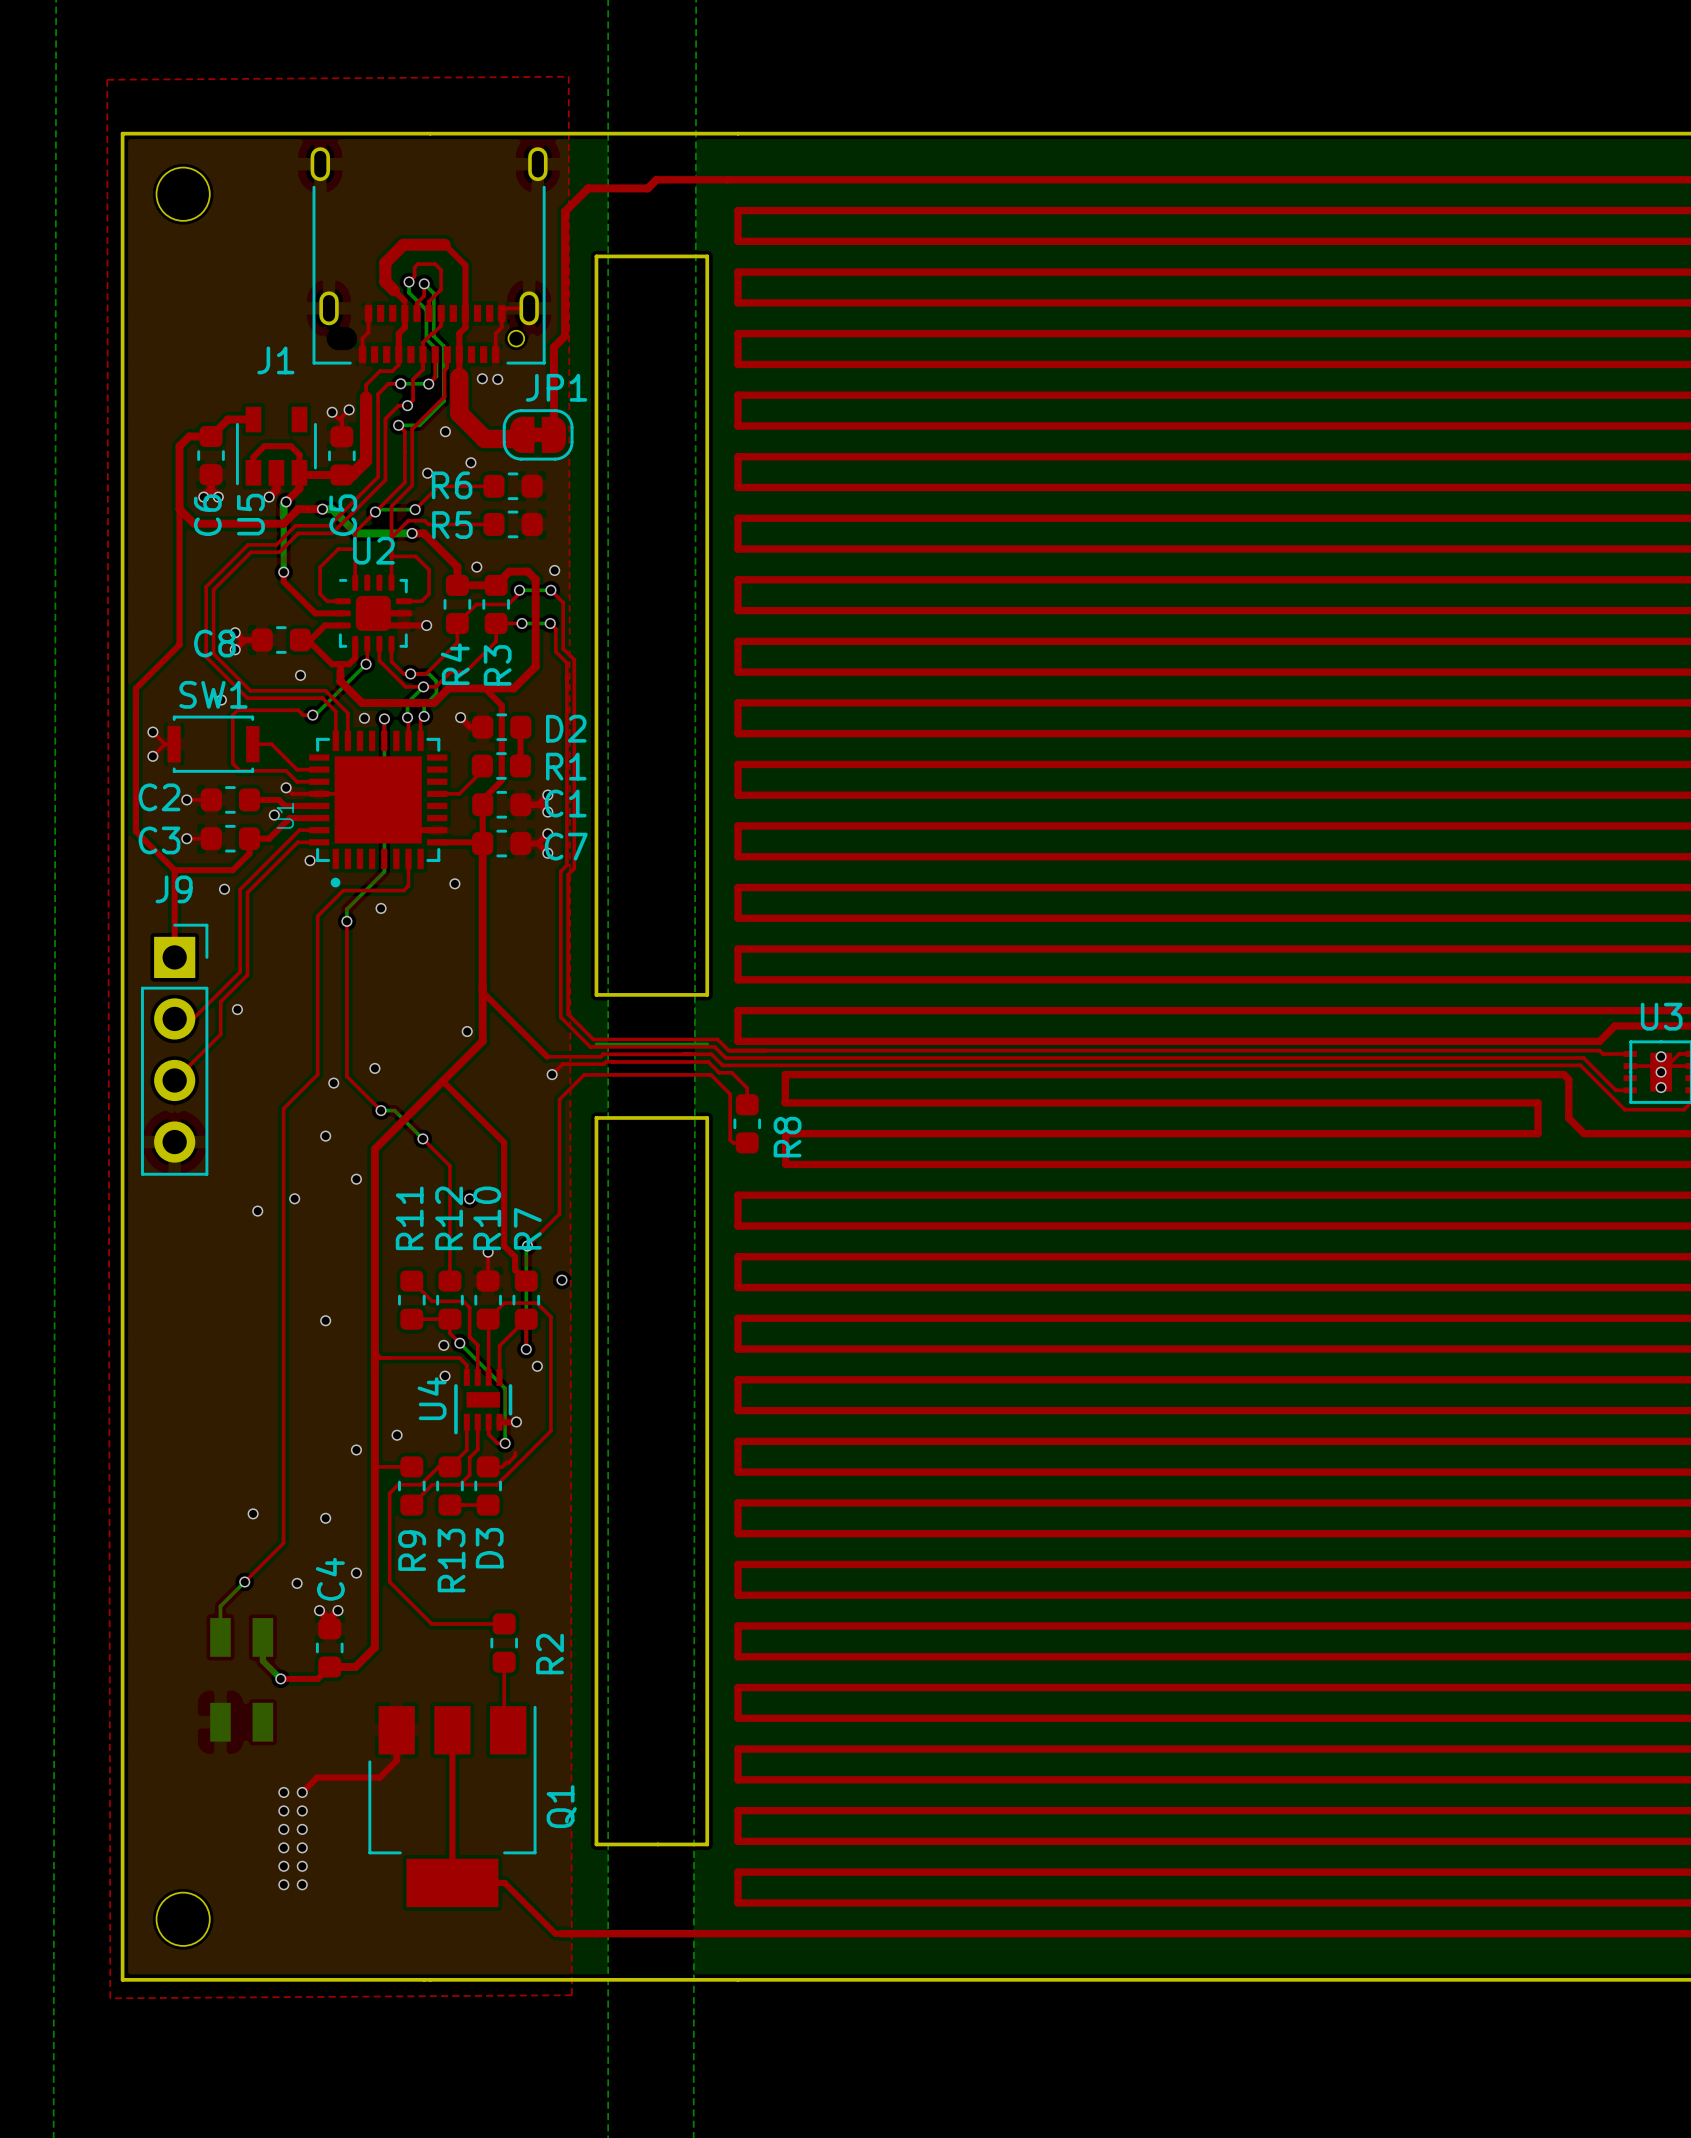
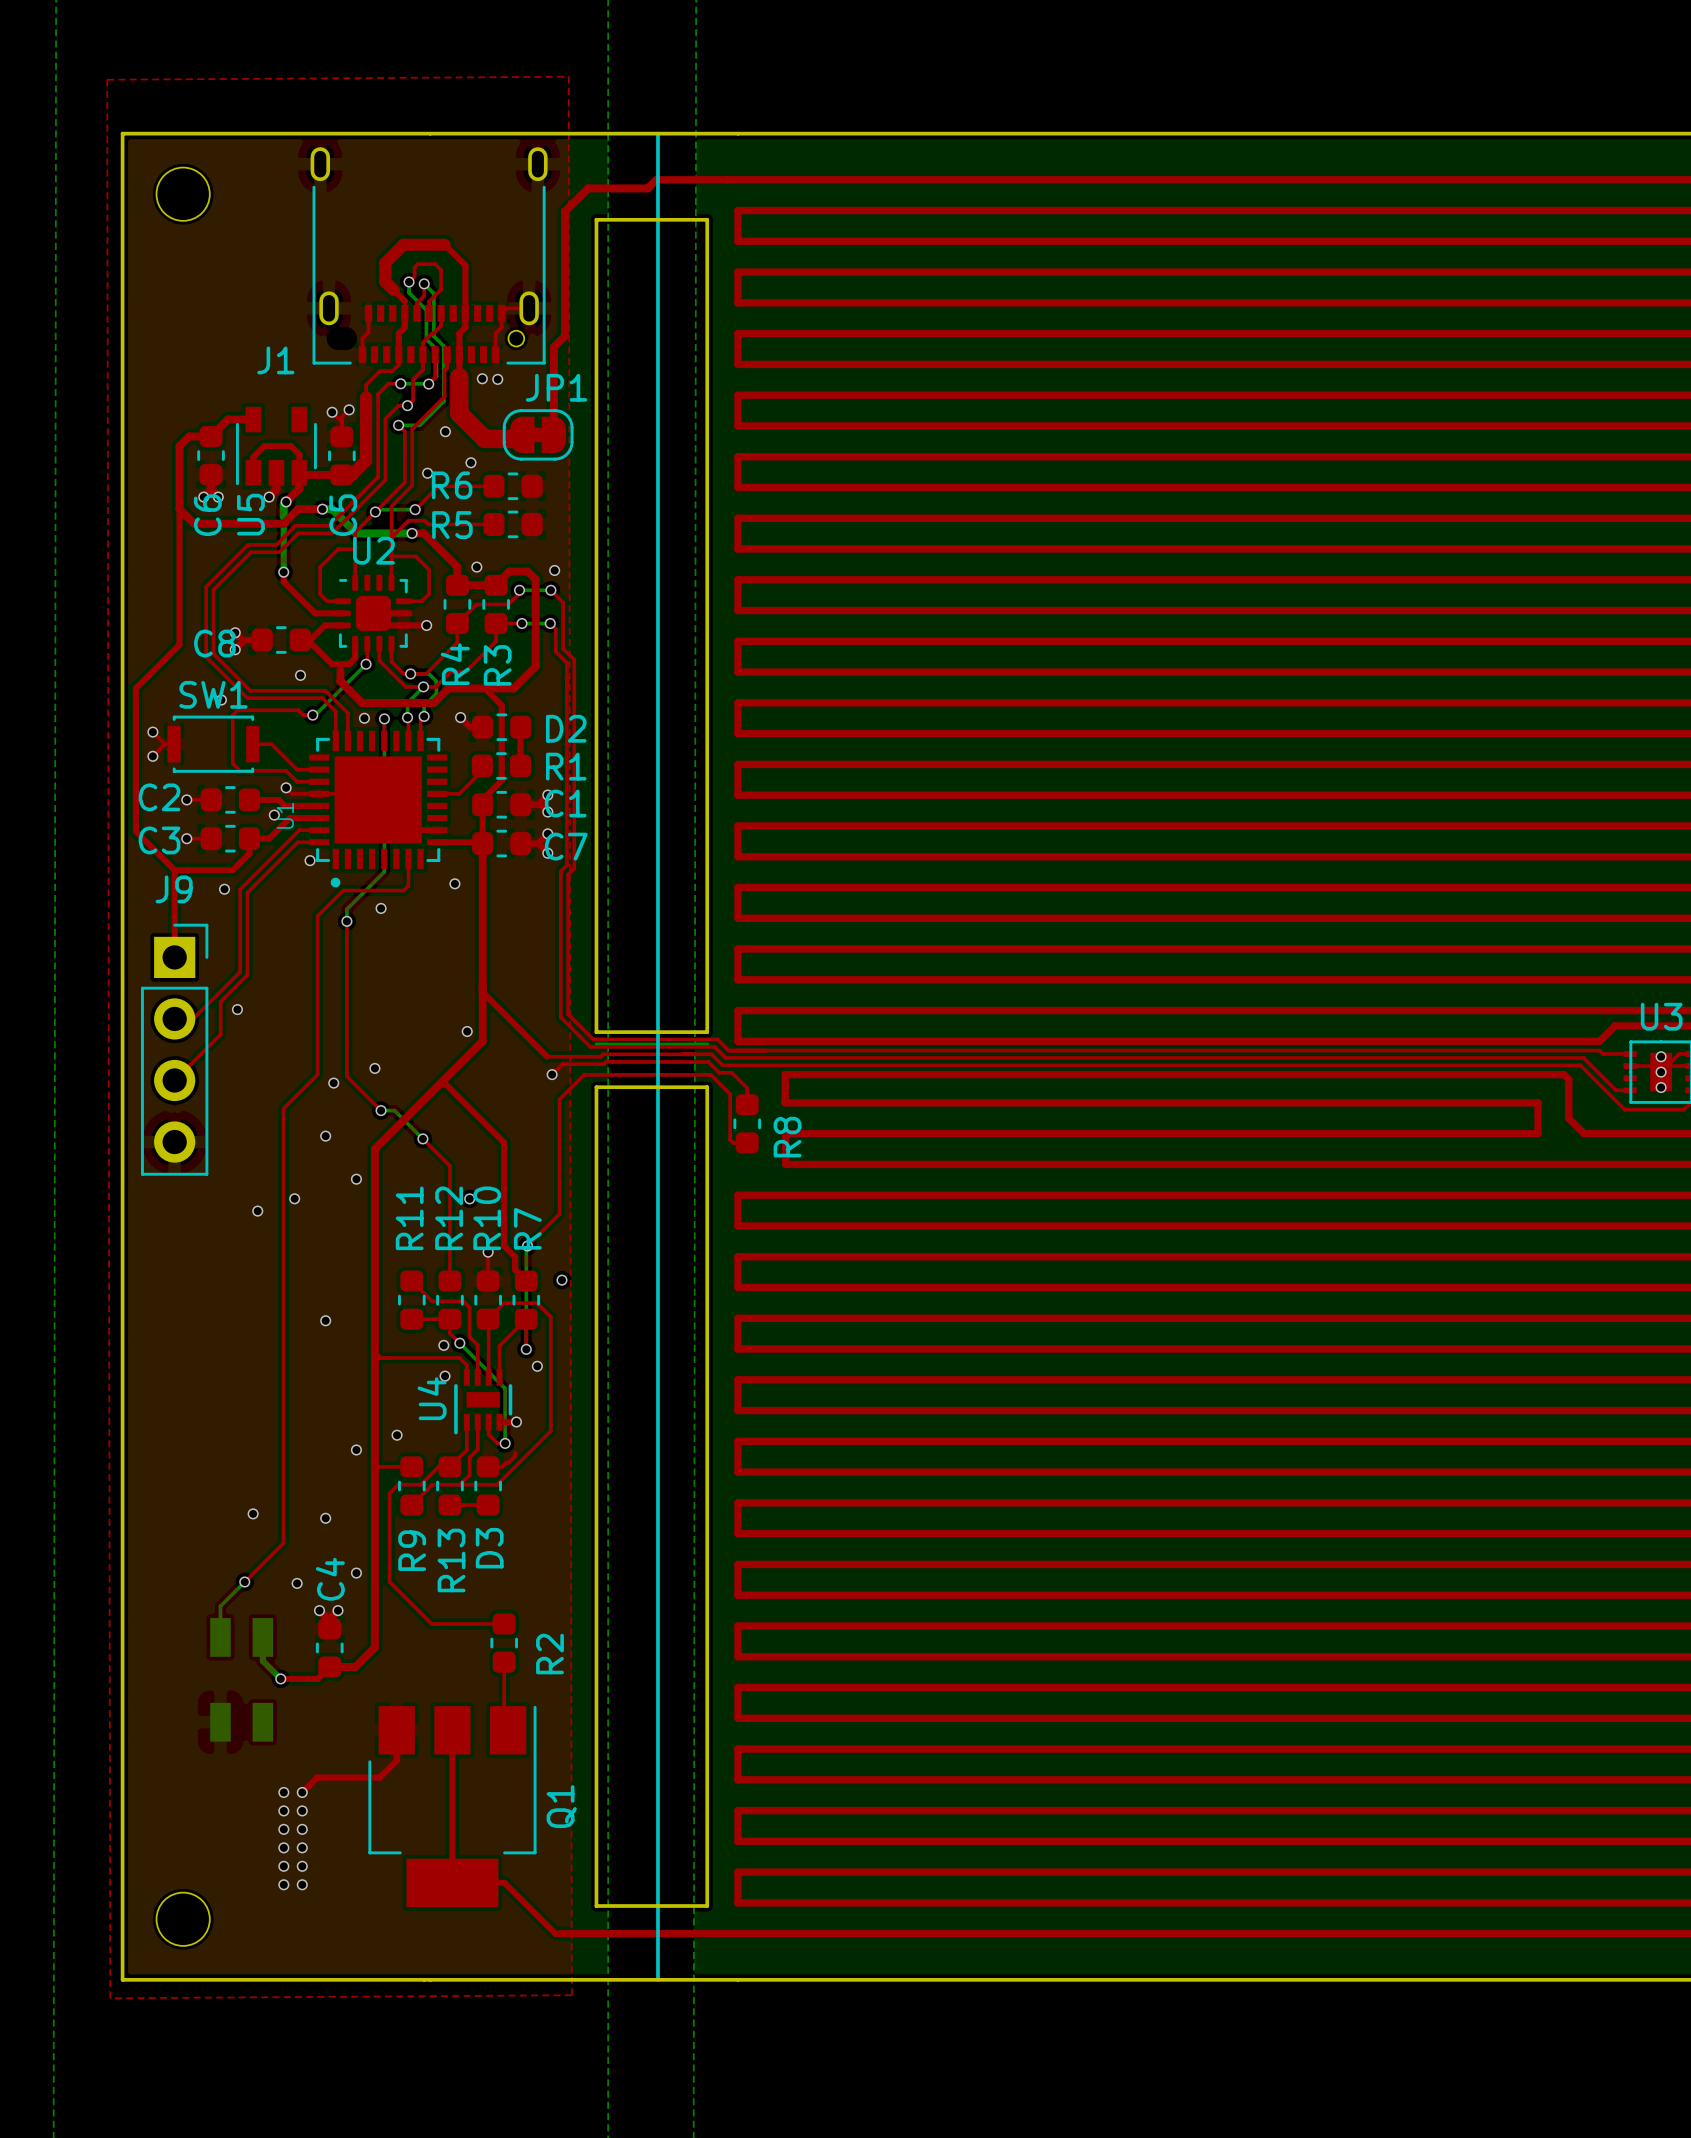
line: none -> (657, 133) (657, 1979)
board edge: (596, 256) (707, 256) -> (596, 256) (596, 219) (707, 219) (707, 256)
board edge: (596, 994) (707, 994) -> (596, 994) (596, 1032) (707, 1032) (707, 994)
board edge: (596, 1117) (707, 1117) -> (596, 1117) (596, 1087) (707, 1087) (707, 1117)
board edge: (596, 1844) (707, 1844) -> (596, 1844) (596, 1906) (707, 1906) (707, 1844)

